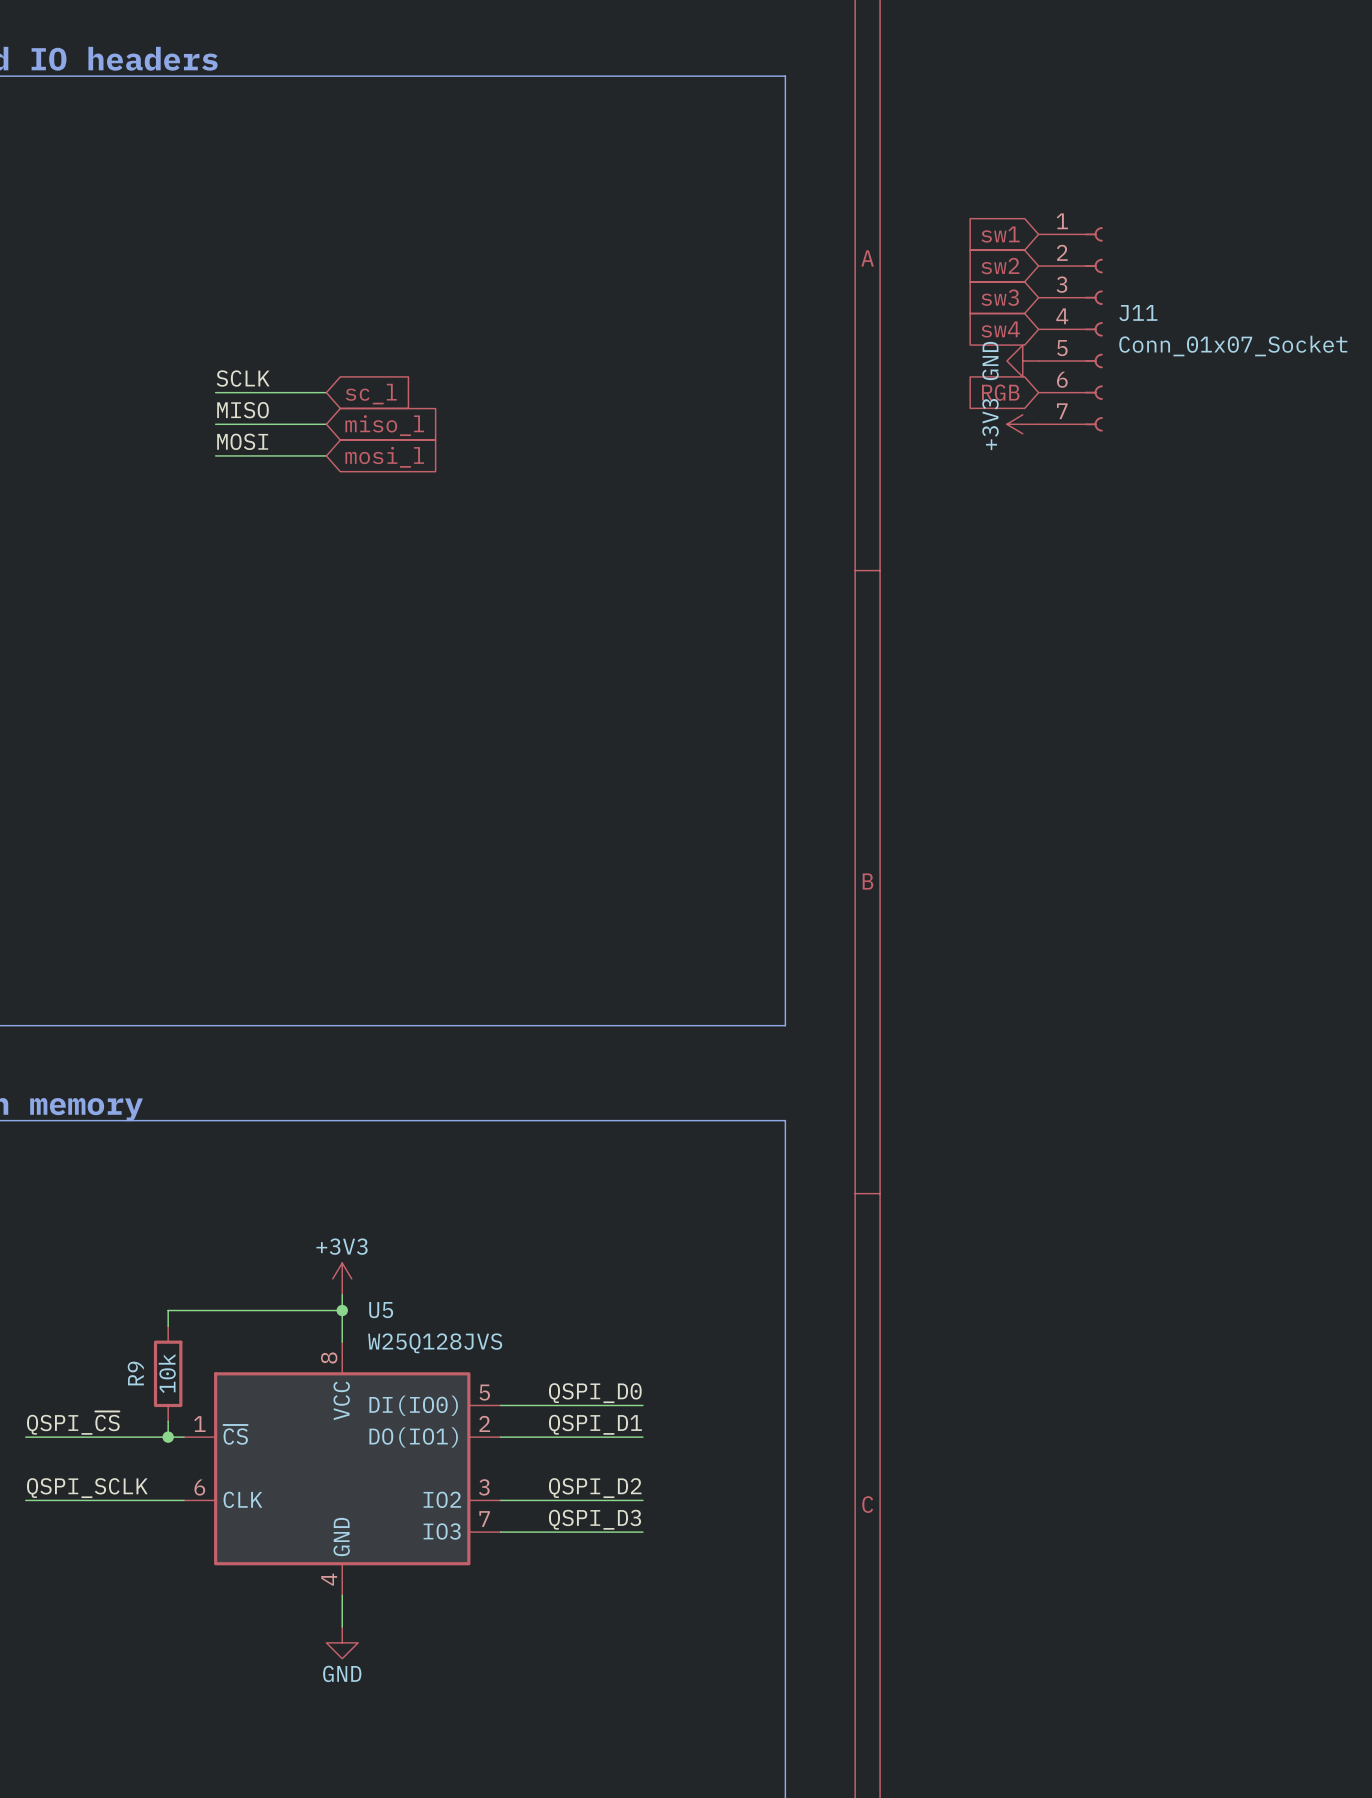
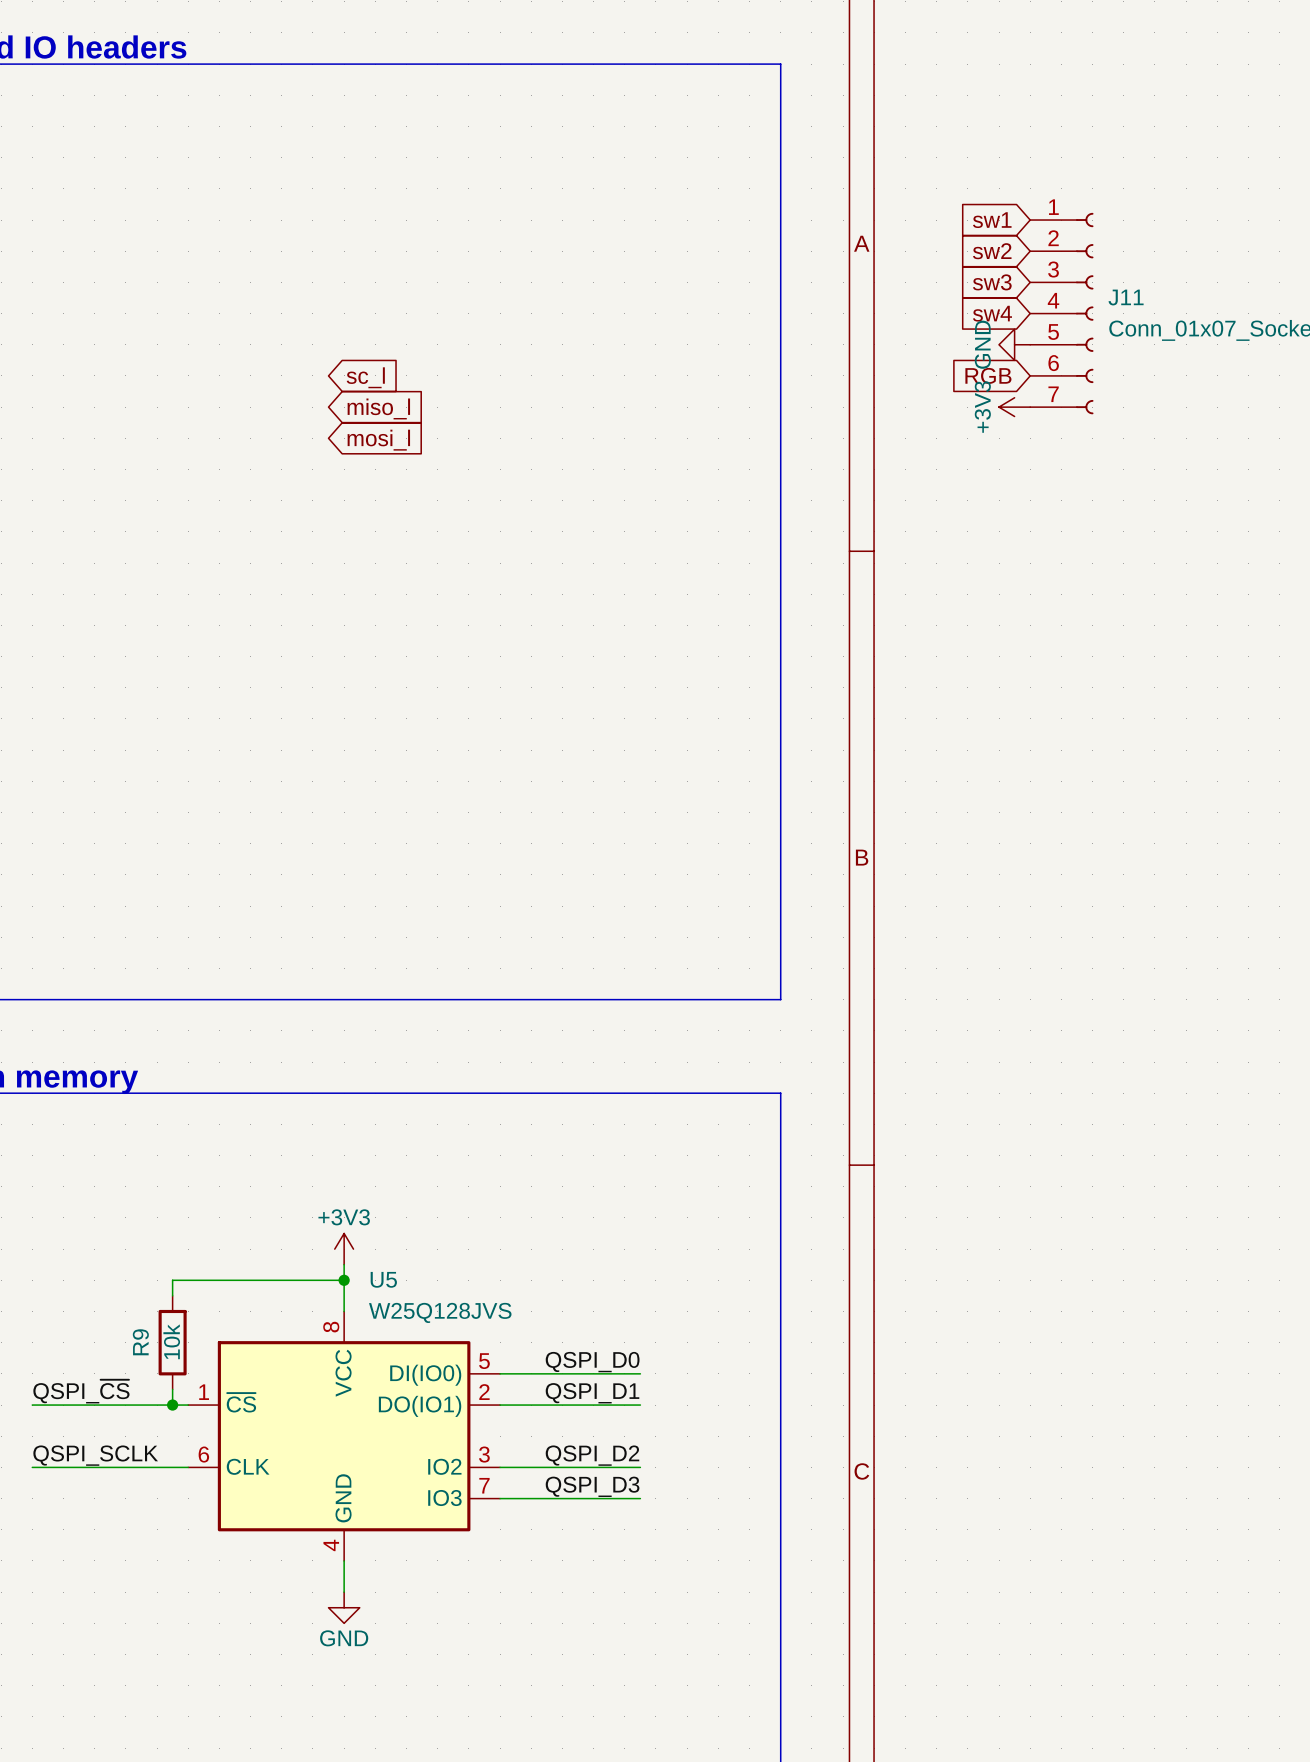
label: SCLK (243, 378) -> none
wire: (215, 392) (326, 392) -> none
label: MISO (242, 410) -> none
wire: (215, 424) (326, 424) -> none
label: MOSI (242, 441) -> none
wire: (215, 455) (326, 455) -> none

